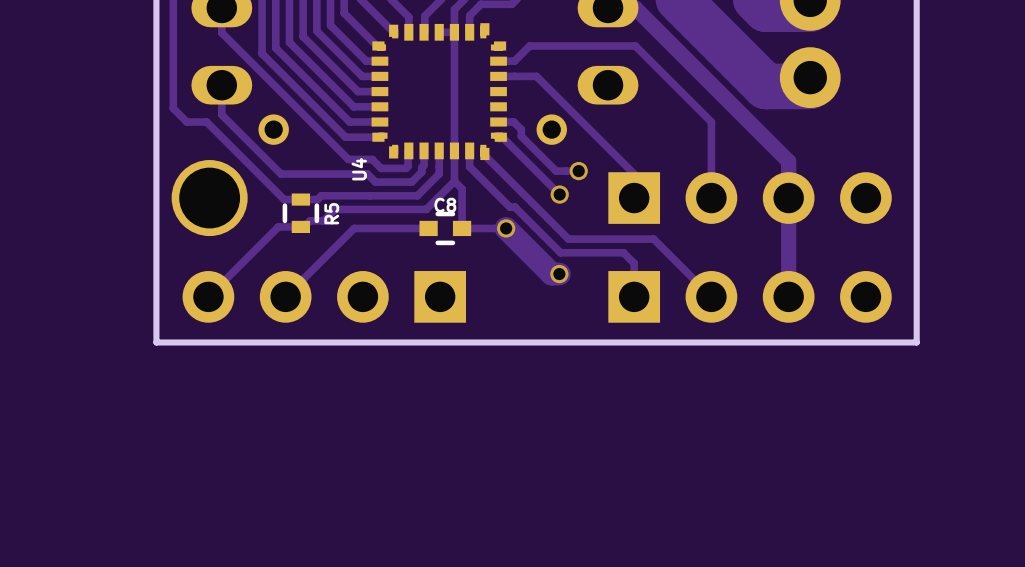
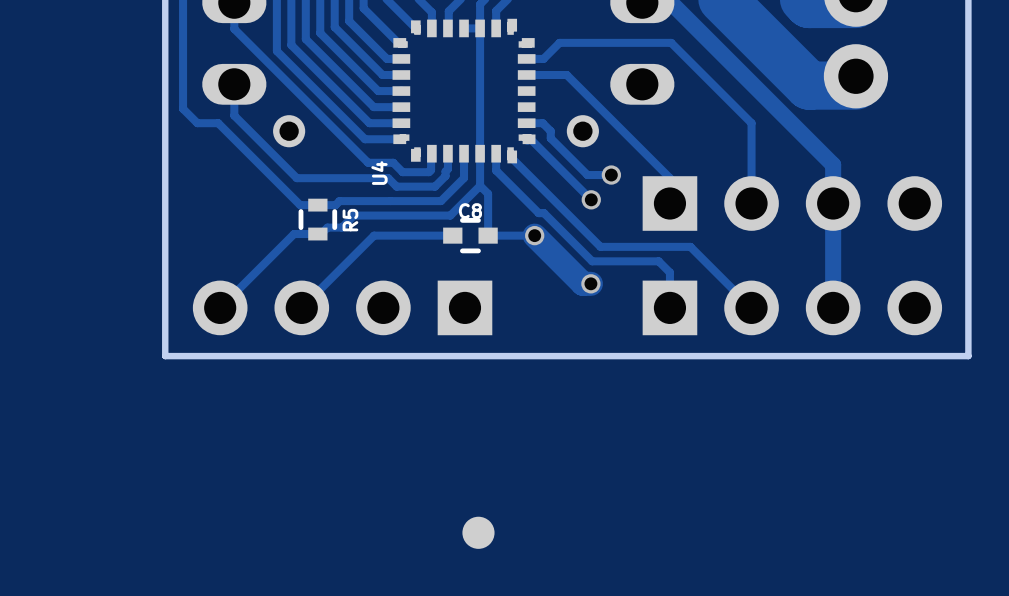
part: (209, 198) -> none
part: none -> (478, 532)

